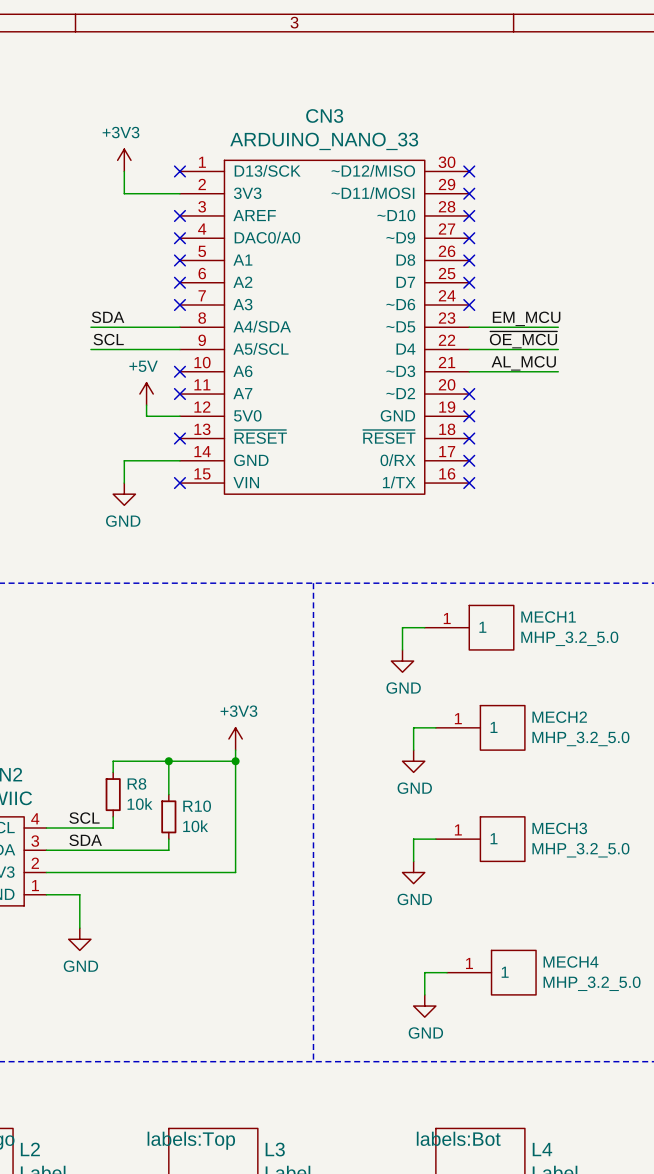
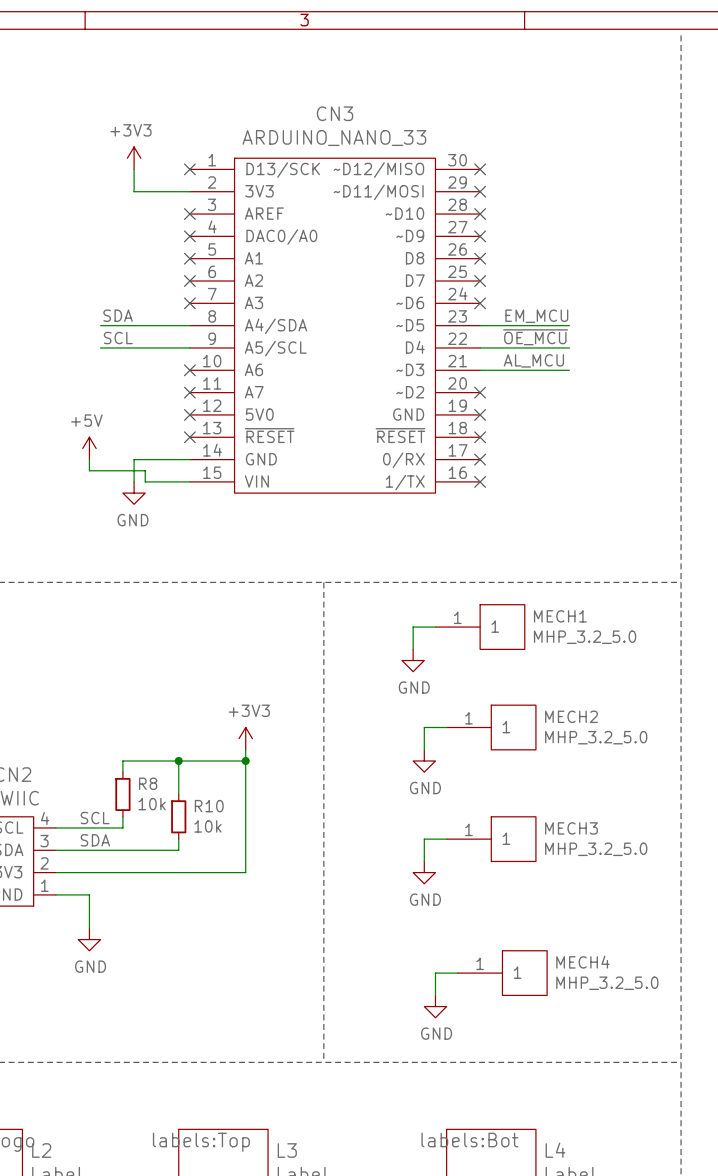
power symbol position: +5V (146, 394) -> +5V (89, 448)
wire: (146, 405) (146, 416) (179, 416) -> none
no-connect mark: none -> (189, 414)
wire: none -> (89, 459) (89, 470) (145, 470) (145, 481) (189, 481)
no-connect mark: (179, 483) -> none

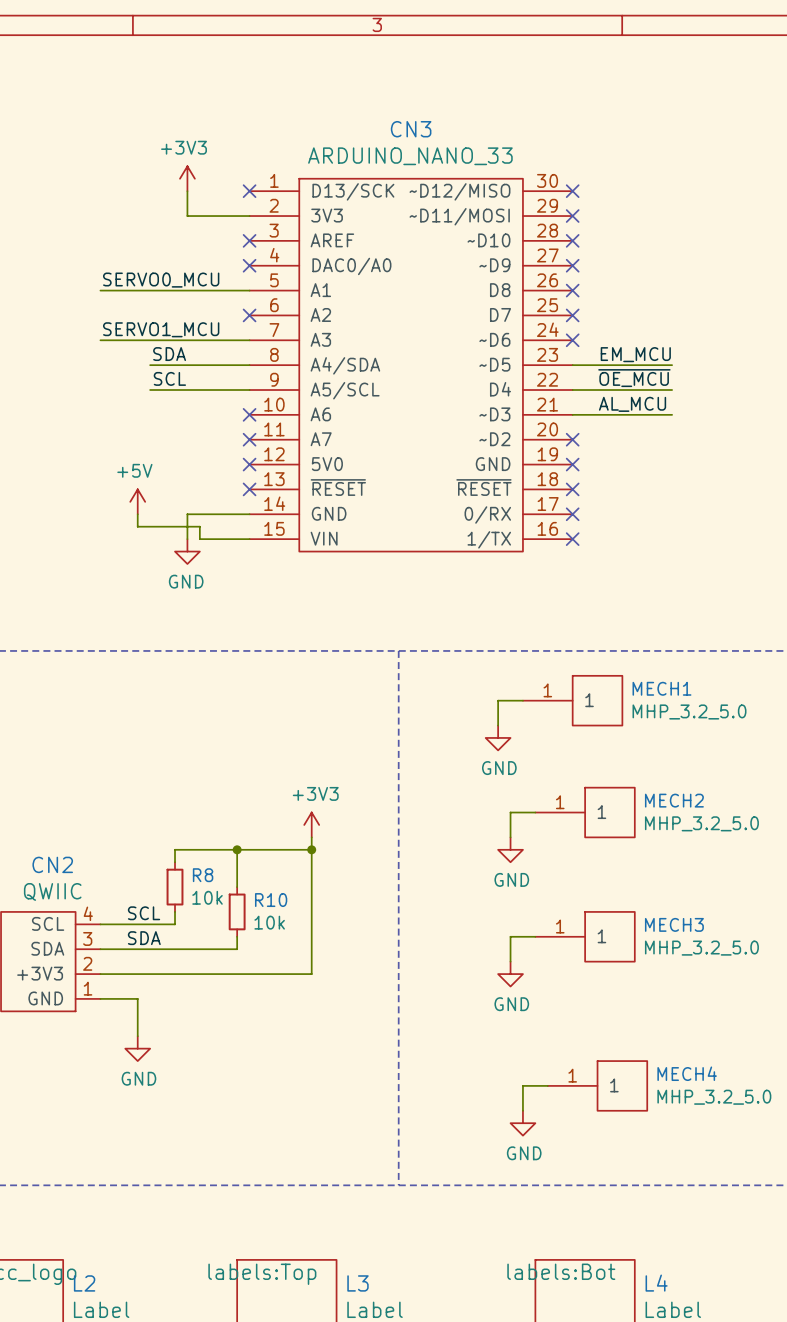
label: none -> SERVO0_MCU (161, 280)
wire: none -> (100, 290) (249, 290)
no-connect mark: (189, 258) -> none
label: none -> SERVO1_MCU (161, 329)
wire: none -> (100, 340) (249, 340)
no-connect mark: (189, 303) -> none

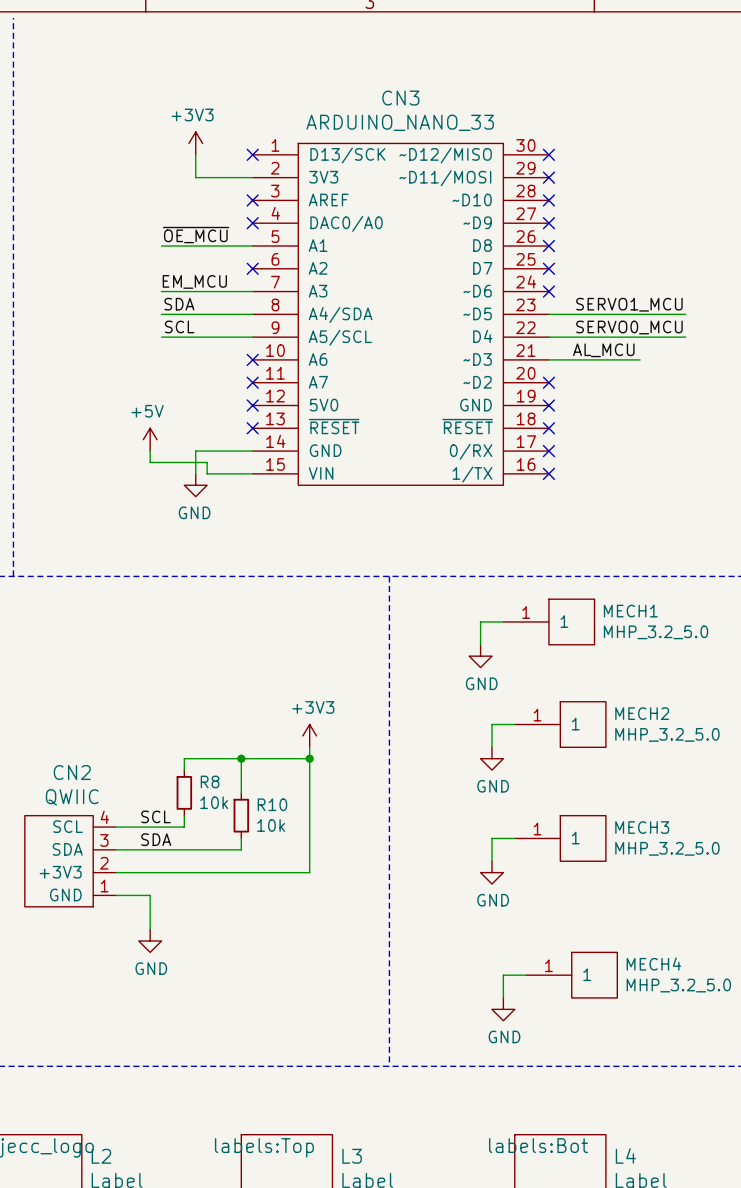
label: none -> ~{OE_MCU} (196, 235)
label: SERVO0_MCU (161, 280) -> none
wire: (100, 290) (150, 290) -> none
label: SERVO1_MCU (161, 329) -> EM_MCU (194, 281)
wire: (100, 340) (150, 340) -> none
label: EM_MCU (635, 354) -> none
label: none -> SERVO1_MCU (629, 304)
wire: none -> (640, 314) (685, 314)
label: ~{OE_MCU} (634, 378) -> none
label: none -> SERVO0_MCU (629, 327)
wire: none -> (640, 337) (685, 337)

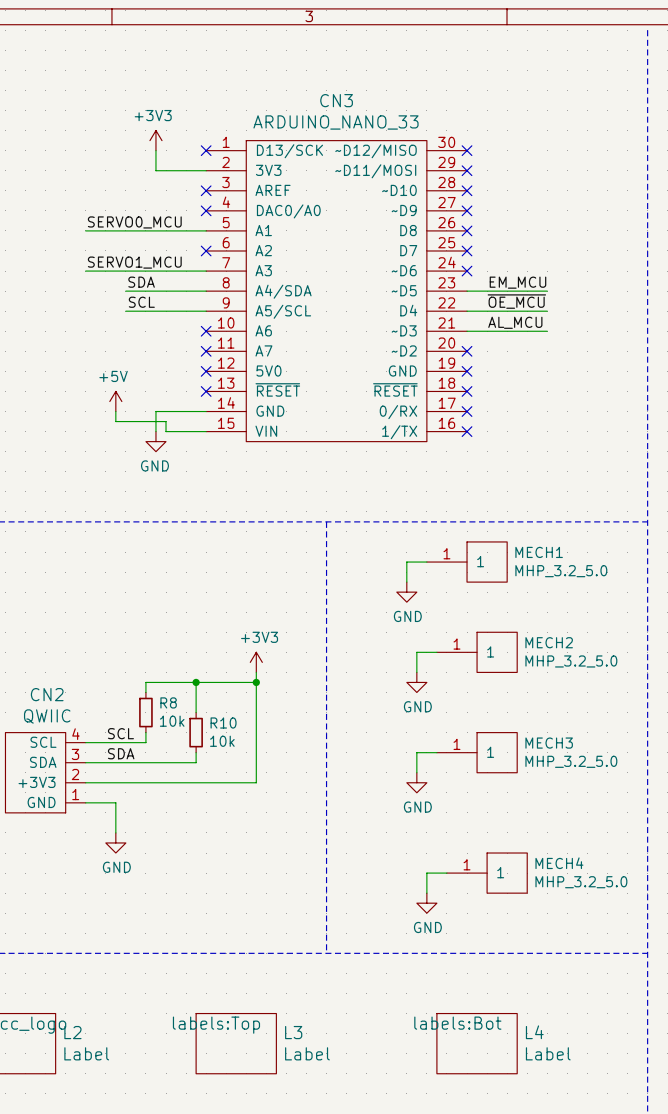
label: ~{OE_MCU} (196, 235) -> none
label: none -> SERVO0_MCU (134, 222)
wire: none -> (85, 230) (125, 230)
label: EM_MCU (194, 281) -> SERVO1_MCU (134, 262)
wire: none -> (85, 271) (125, 271)
label: none -> EM_MCU (517, 282)
label: SERVO1_MCU (629, 304) -> none
wire: (640, 314) (685, 314) -> none
label: none -> ~{OE_MCU} (516, 301)
label: SERVO0_MCU (629, 327) -> none
wire: (640, 337) (685, 337) -> none

